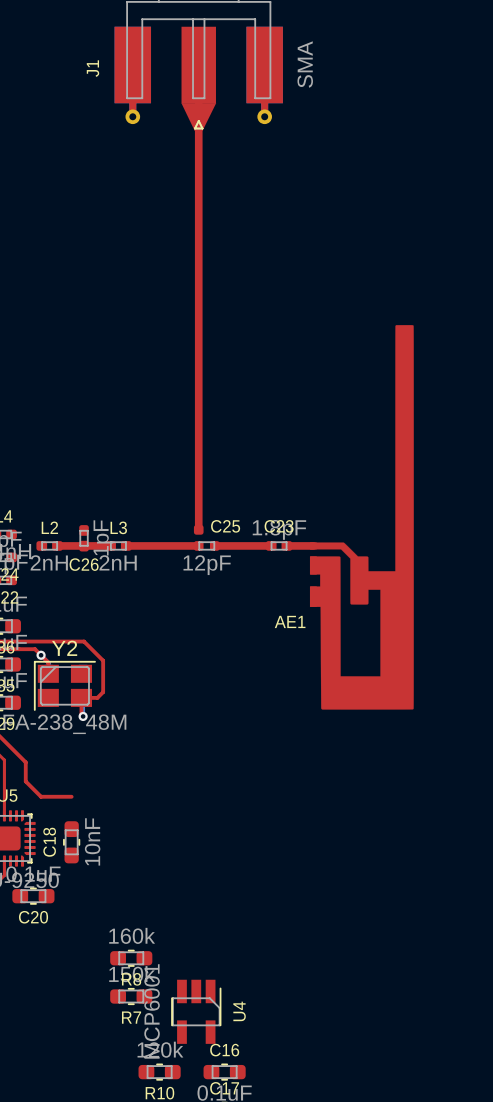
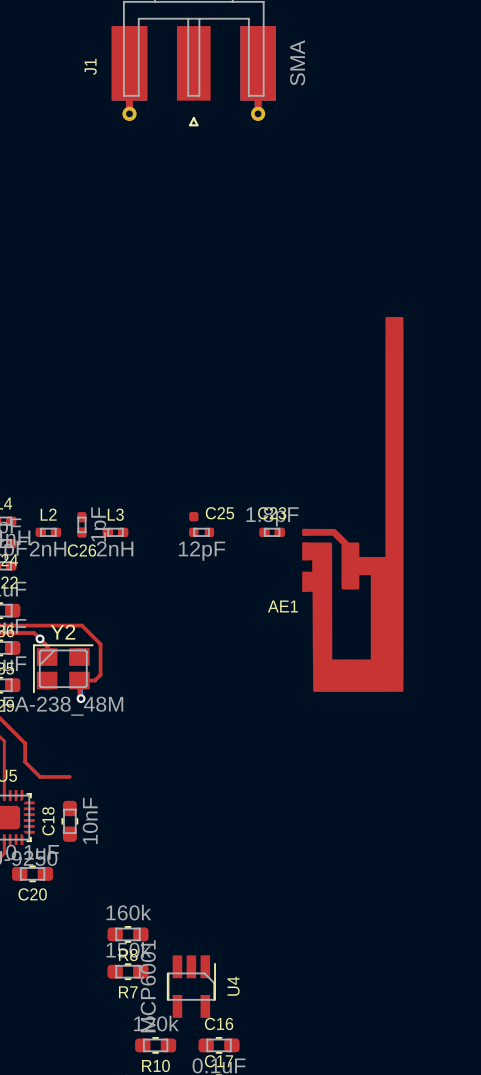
top track: (198, 64) (198, 529) -> none
drawing: [181, 103, 217, 132] -> none
top track: (57, 545) (83, 545) -> none
top track: (84, 545) (110, 545) -> none
top track: (126, 545) (198, 545) -> none
top track: (214, 545) (271, 545) -> none
top track: (286, 545) (313, 545) -> none

